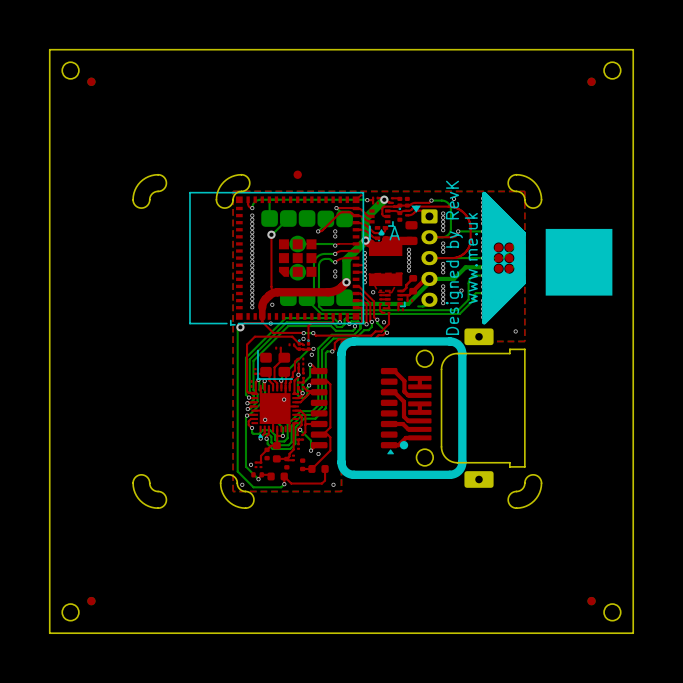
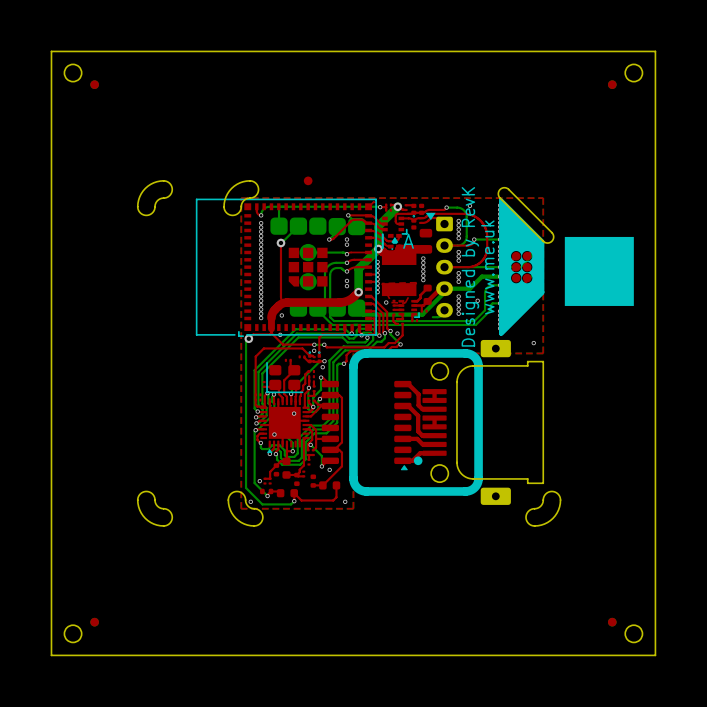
board edge: (516, 174) (529, 178) (538, 187) (541, 199) (537, 206) (528, 206) (522, 193) (509, 187) (509, 178) (516, 174) -> none
board edge: none -> (508, 189) (552, 233) (553, 237) (551, 241) (543, 241) (499, 197) (498, 193) (500, 189) (504, 187) (508, 189)

